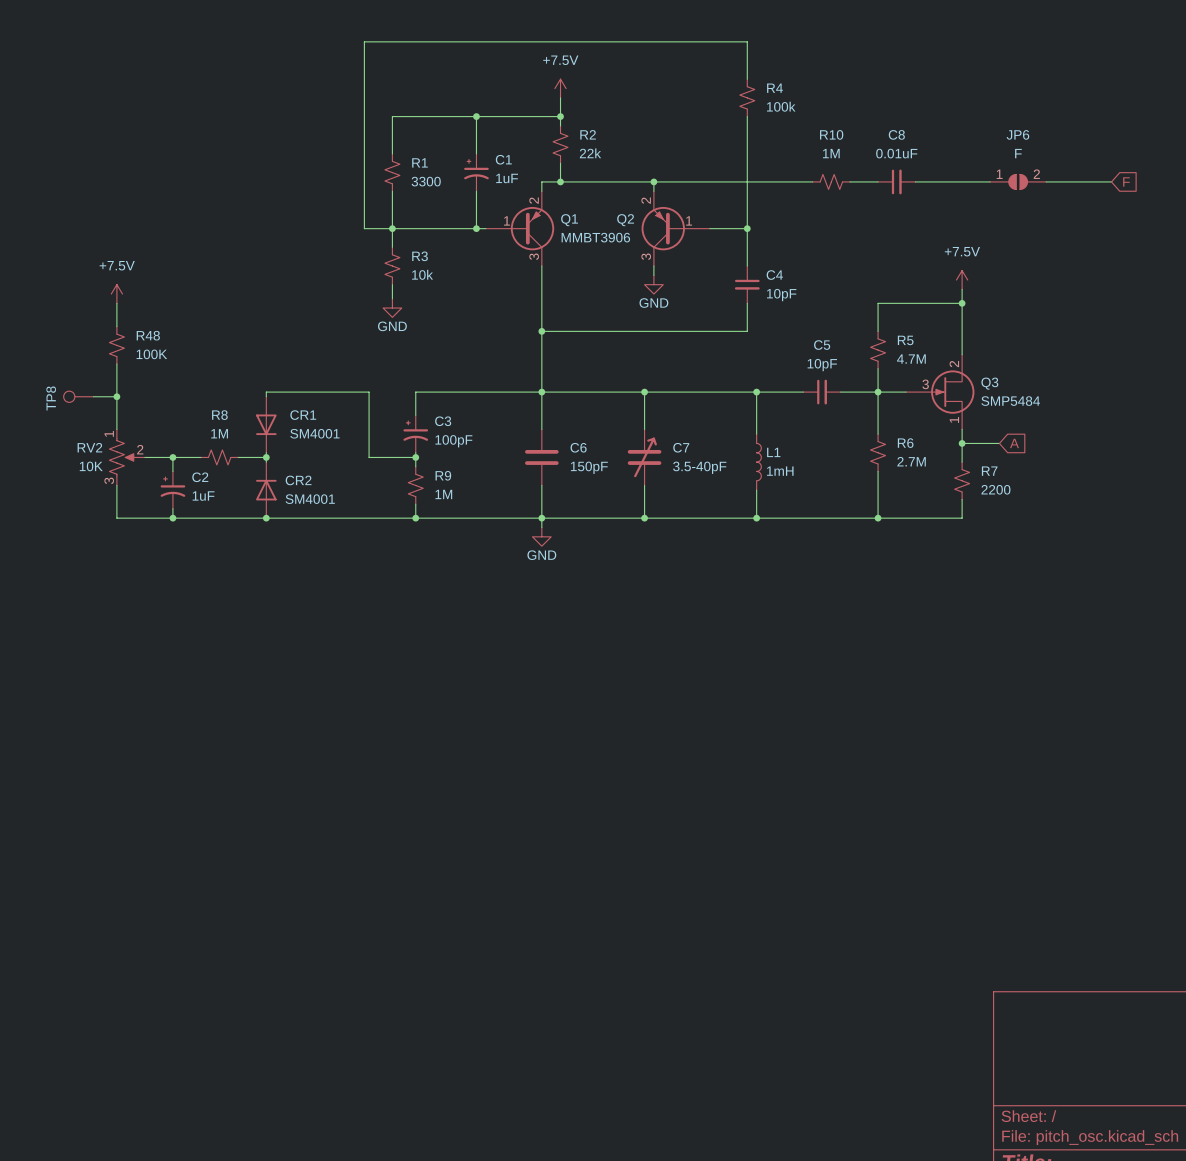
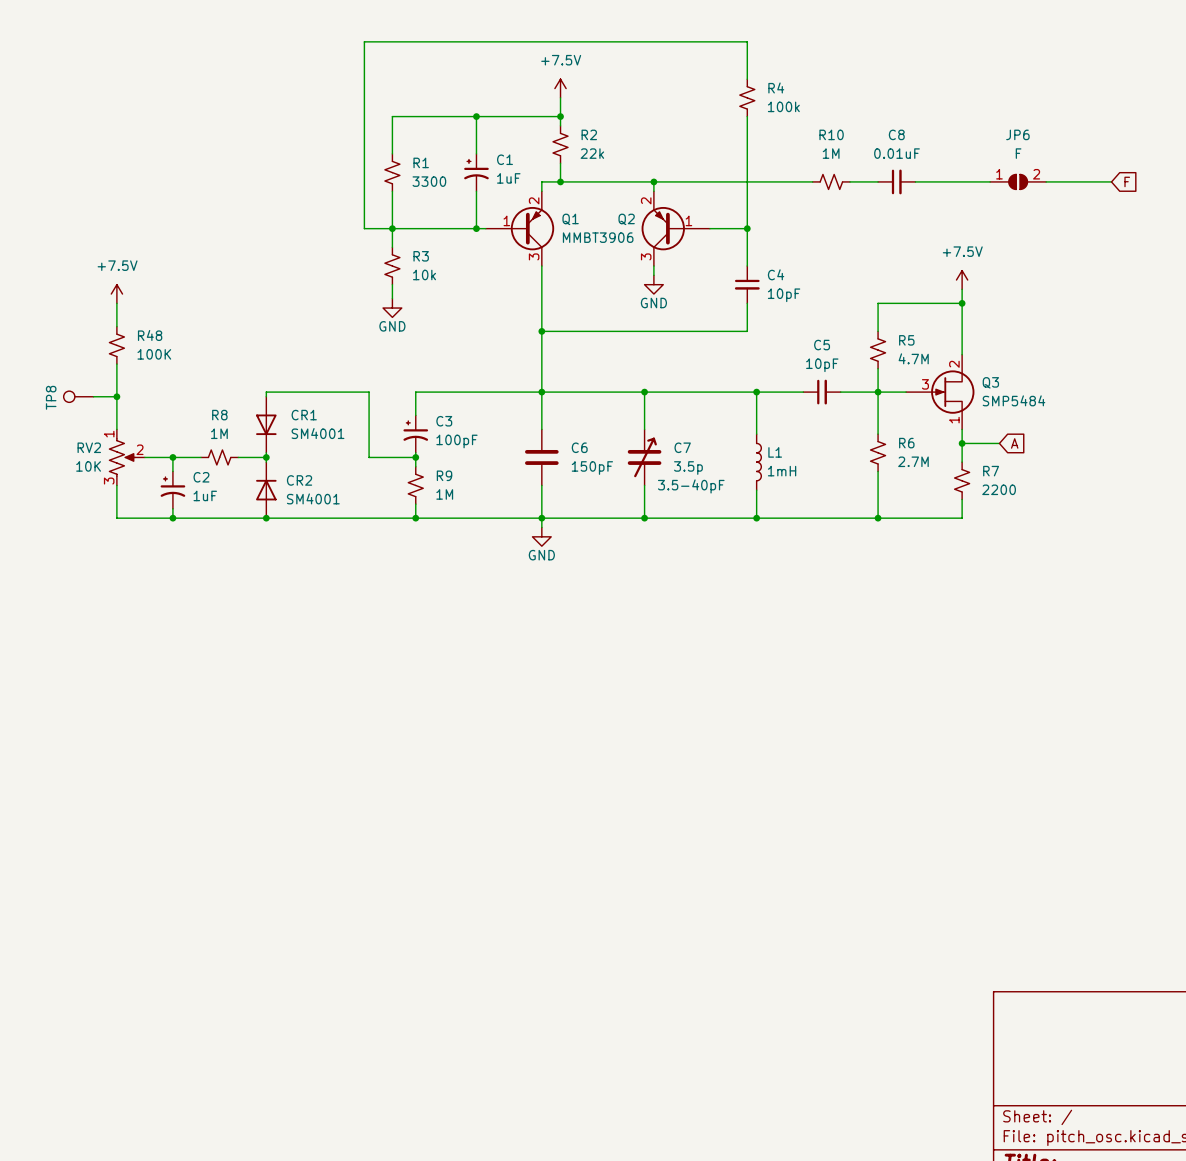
C7 value: 3.5-40pF (699, 467) -> 3.5p (688, 468)
C7 text: none -> 3.5-40pF (691, 486)

